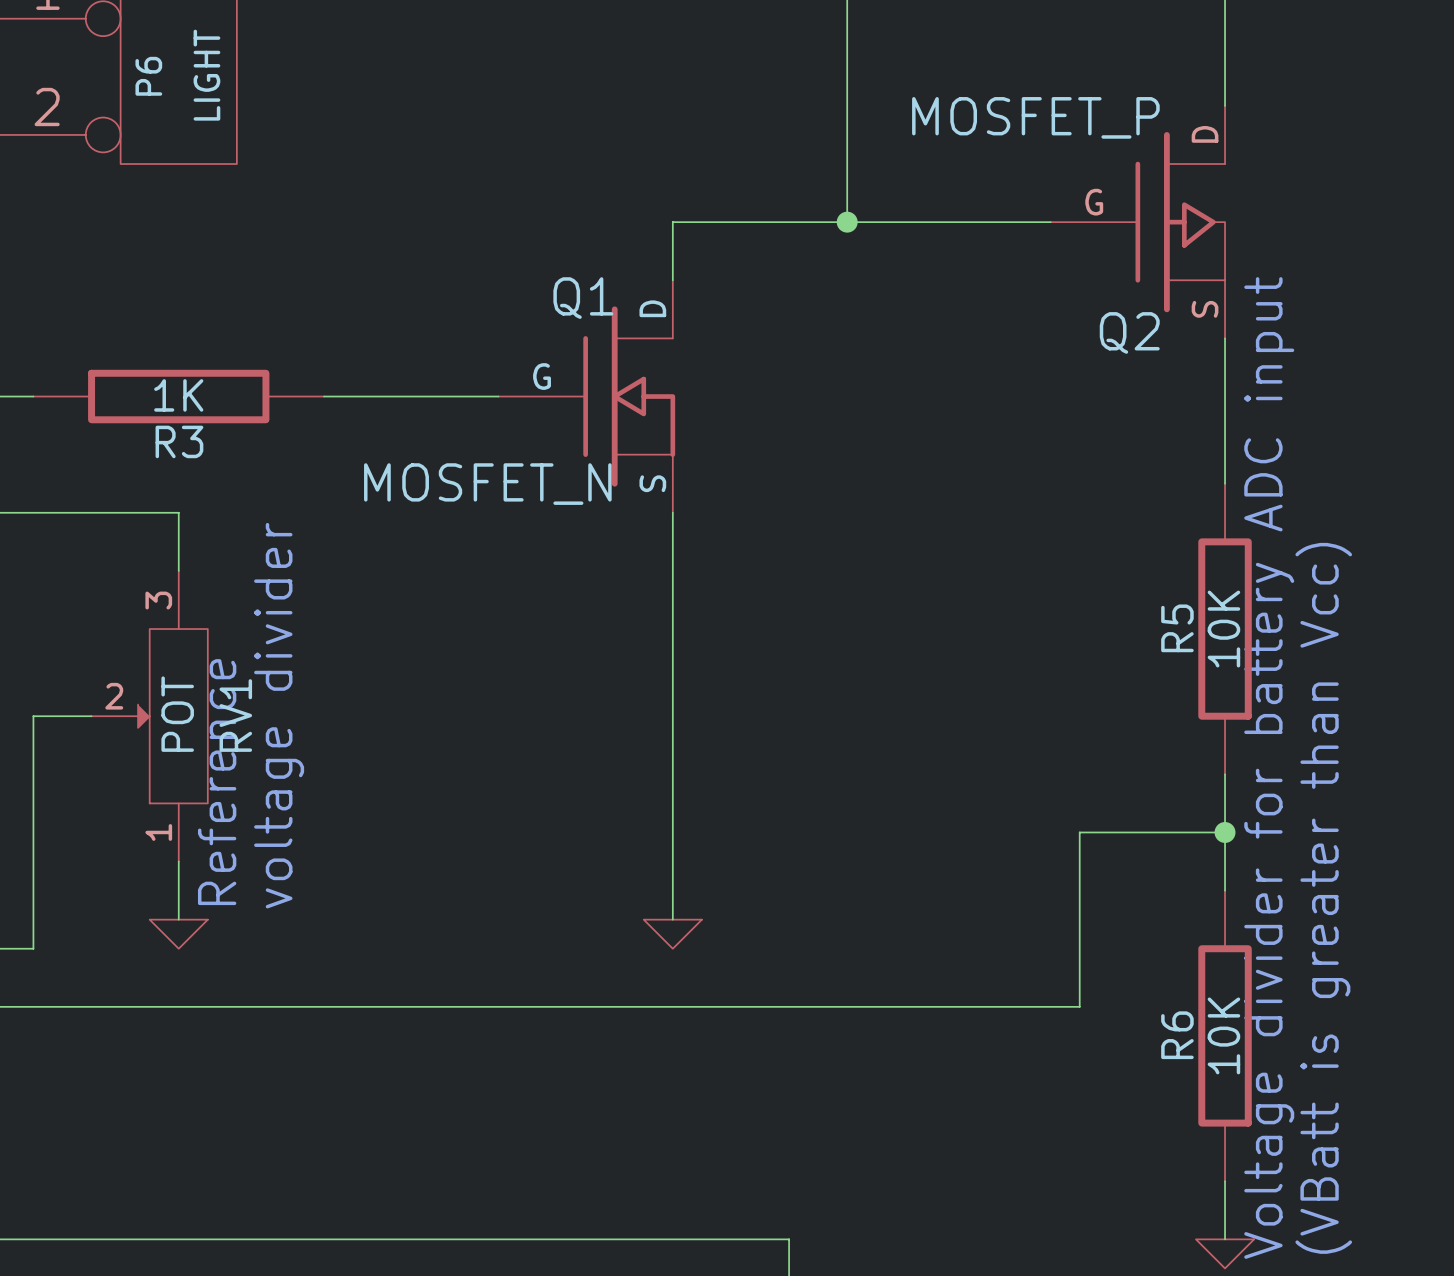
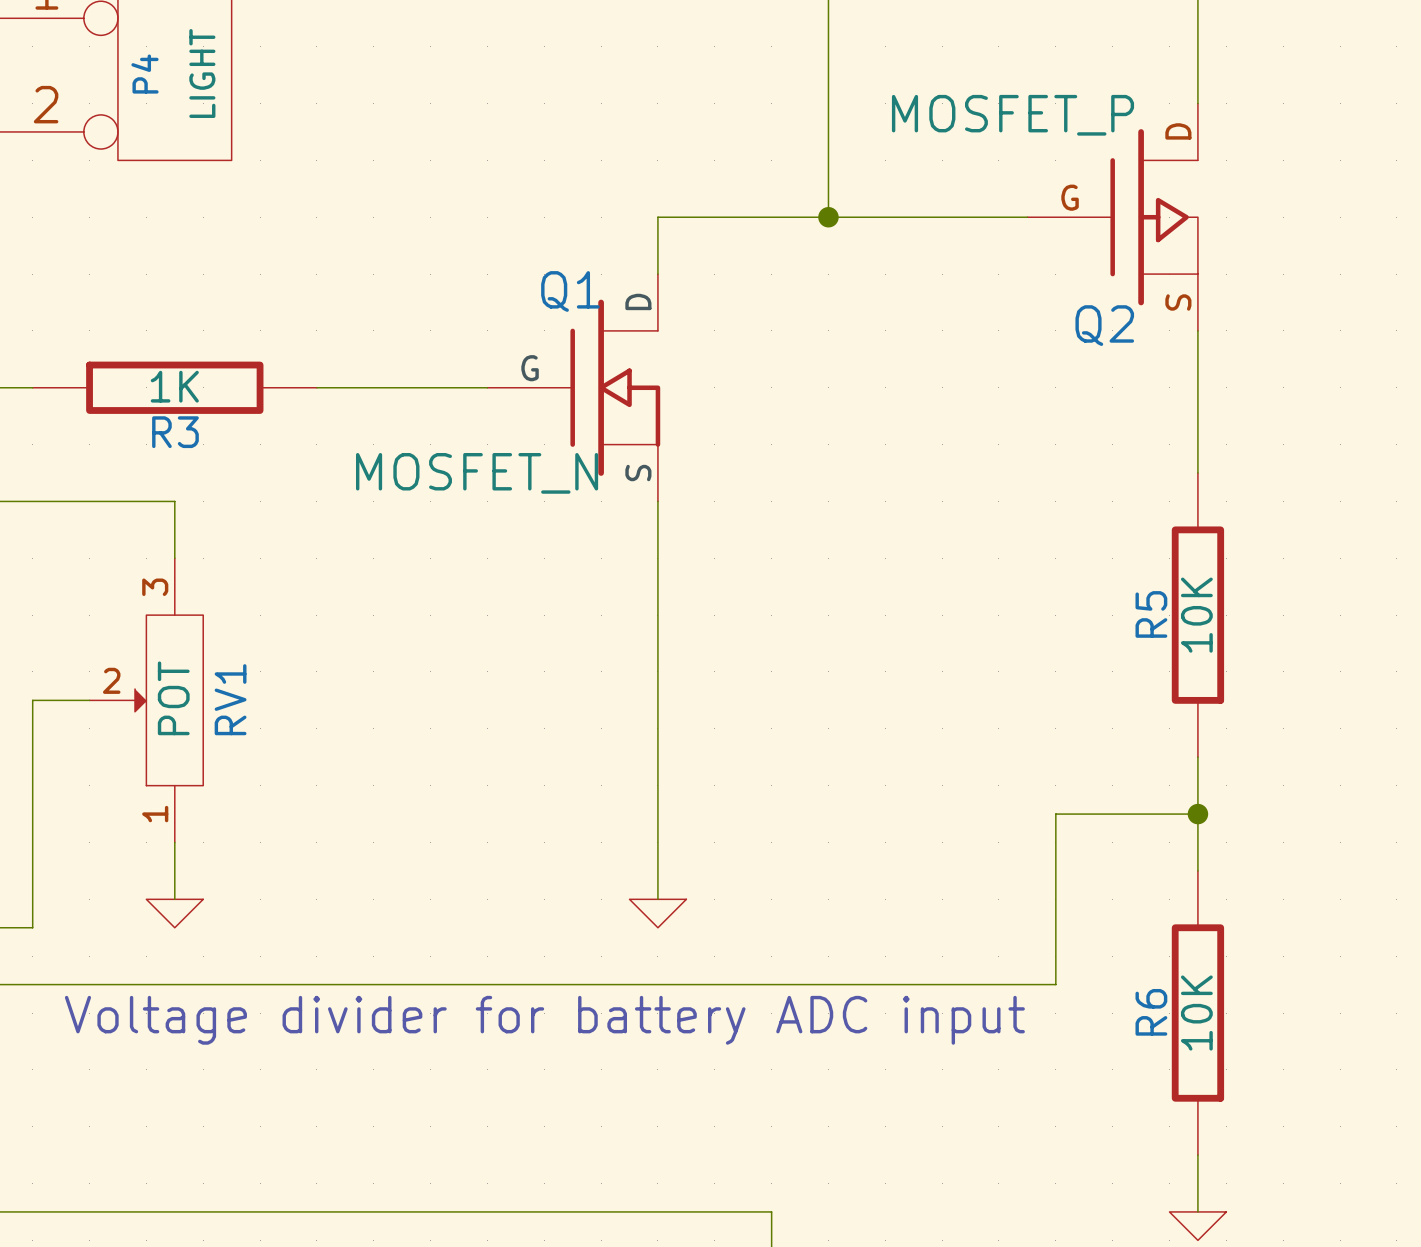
P6 name: P6 (148, 76) -> P4 (144, 74)
text: voltage divider (279, 715) -> none
text: Voltage divider for battery ADC input (1269, 767) -> none
text: Reference (217, 782) -> none
text: (VBatt is greater than Vcc) (1323, 898) -> none
text: none -> Voltage divider for battery ADC input (544, 1020)

